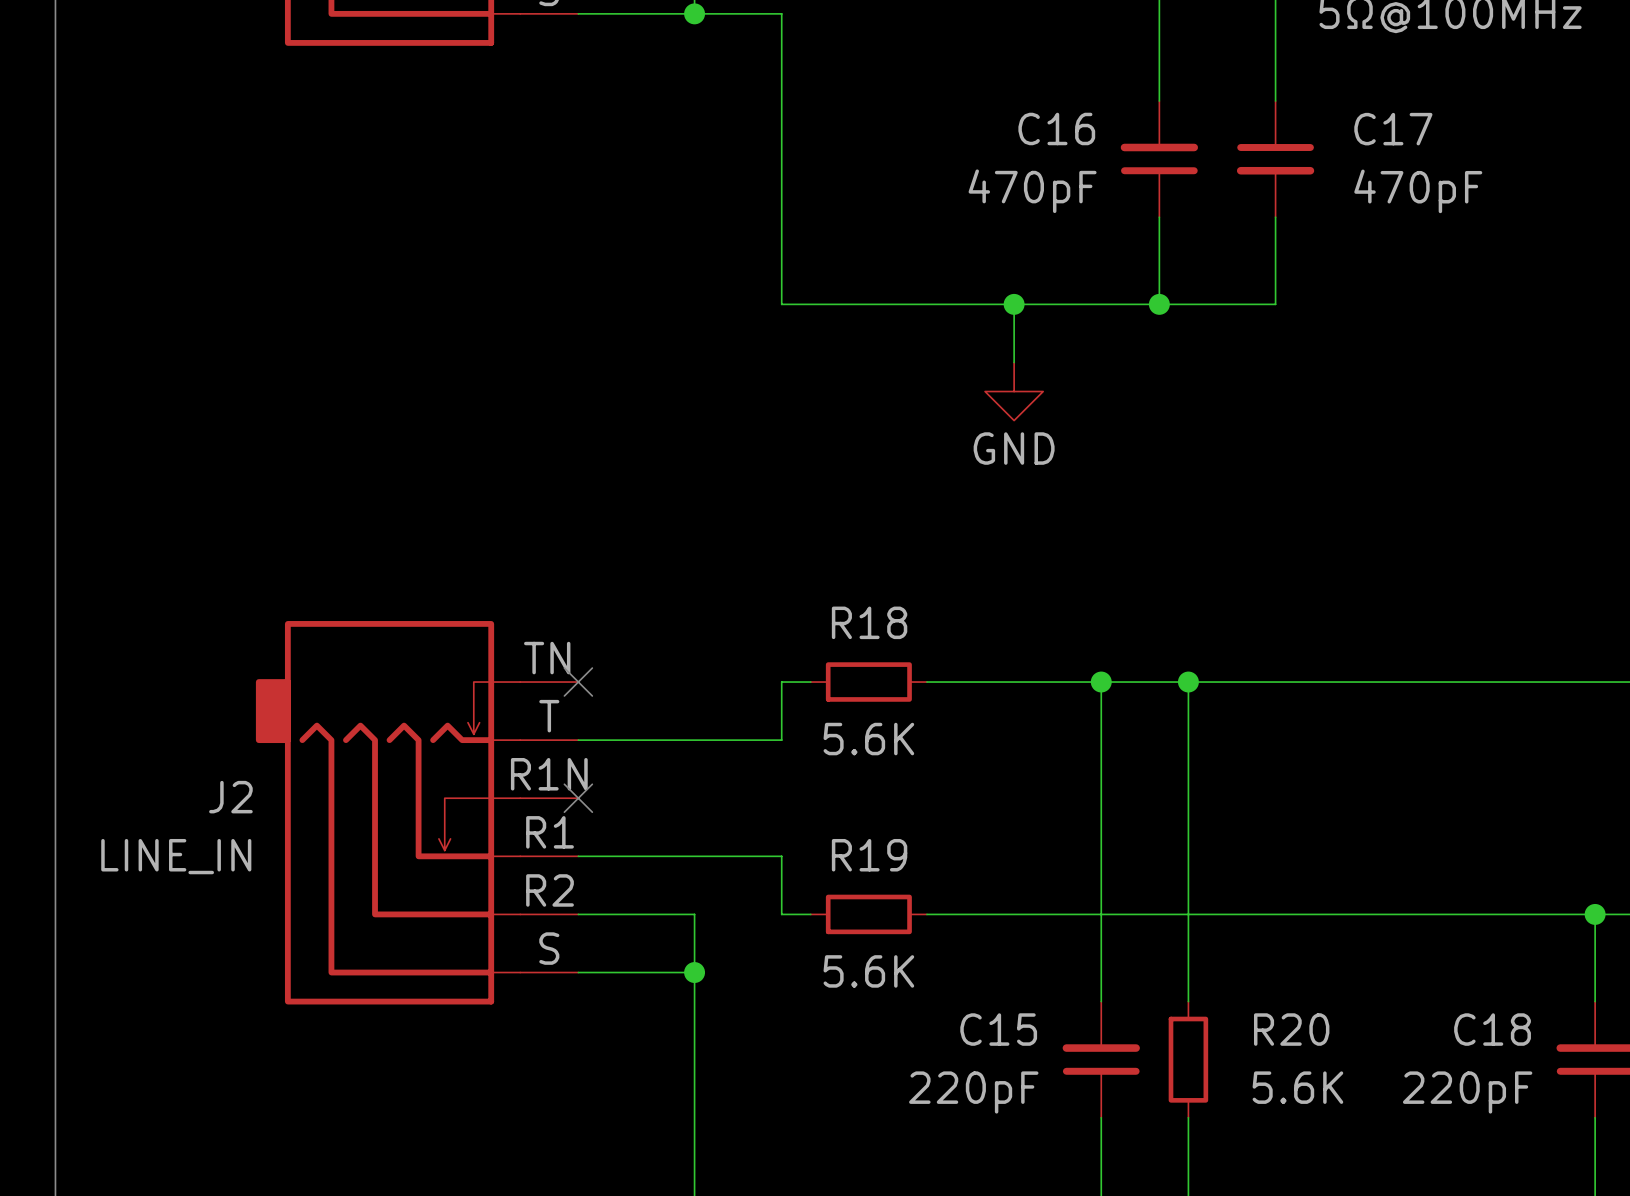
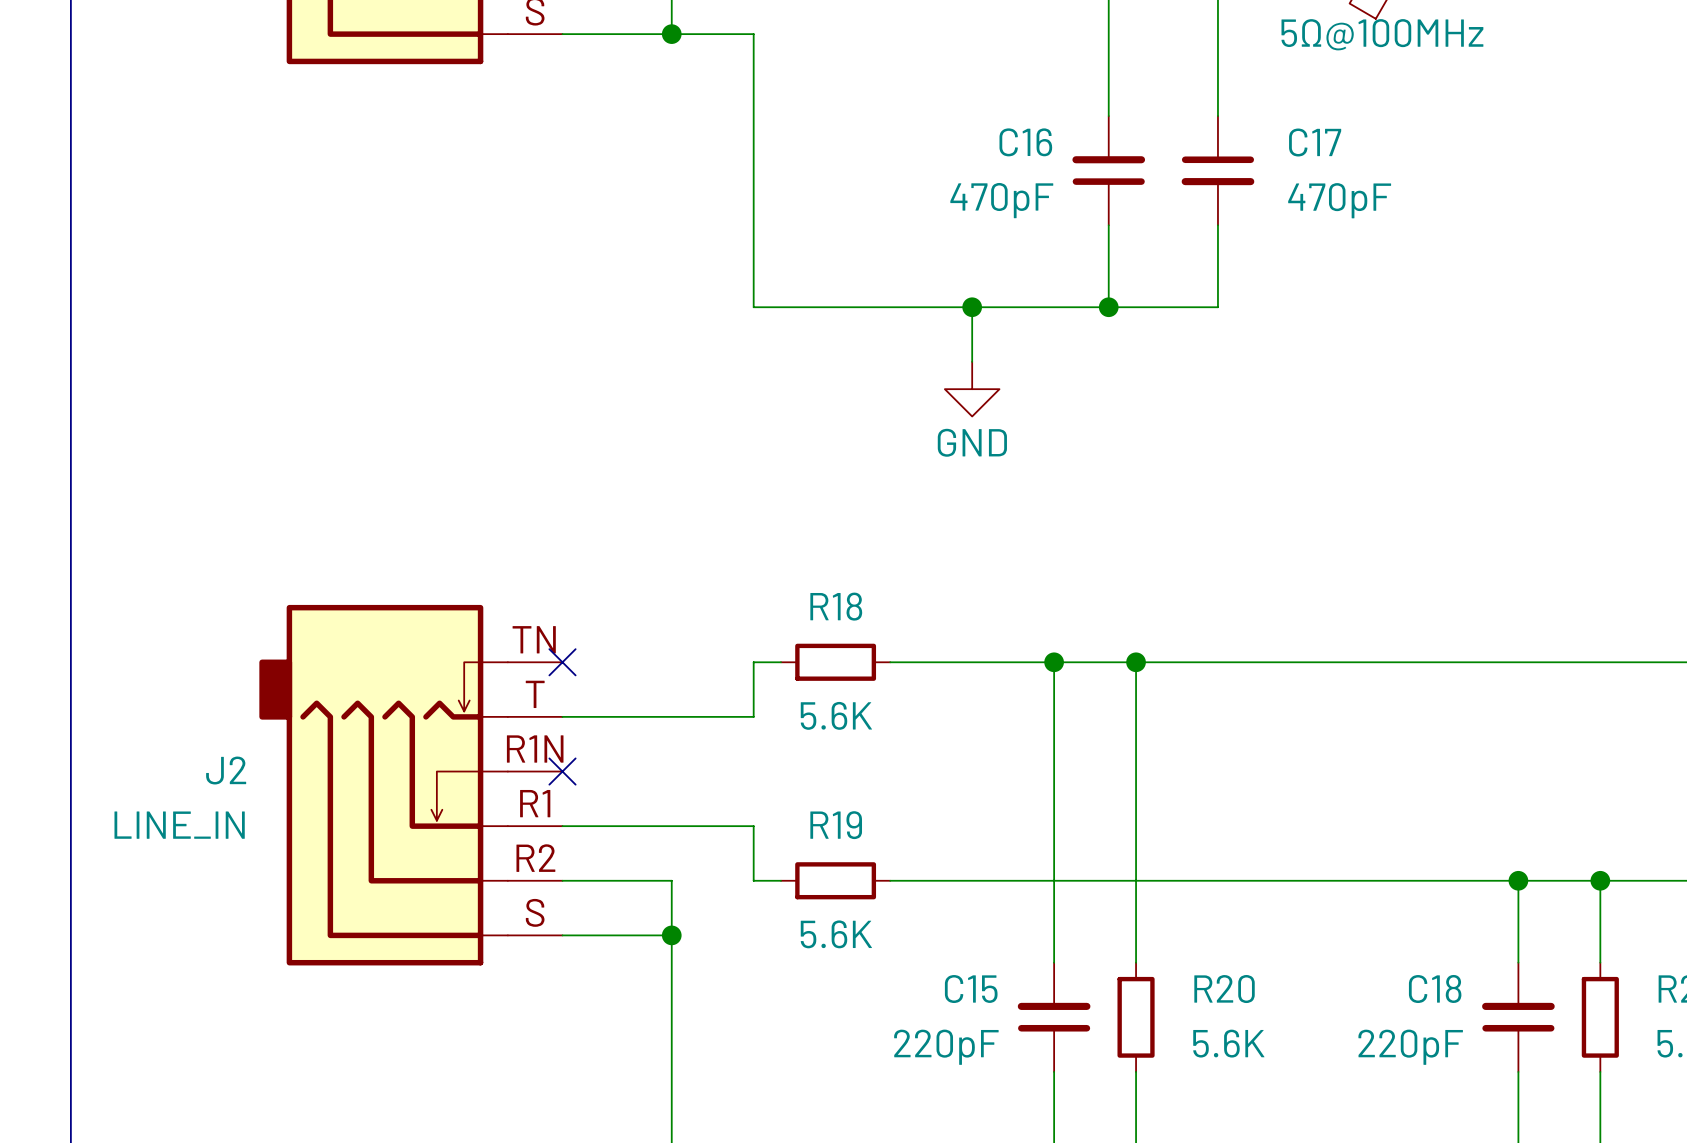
J2 name position: J2 (230, 797) -> J2 (226, 770)
J2 value position: LINE_IN (176, 856) -> LINE_IN (179, 825)

